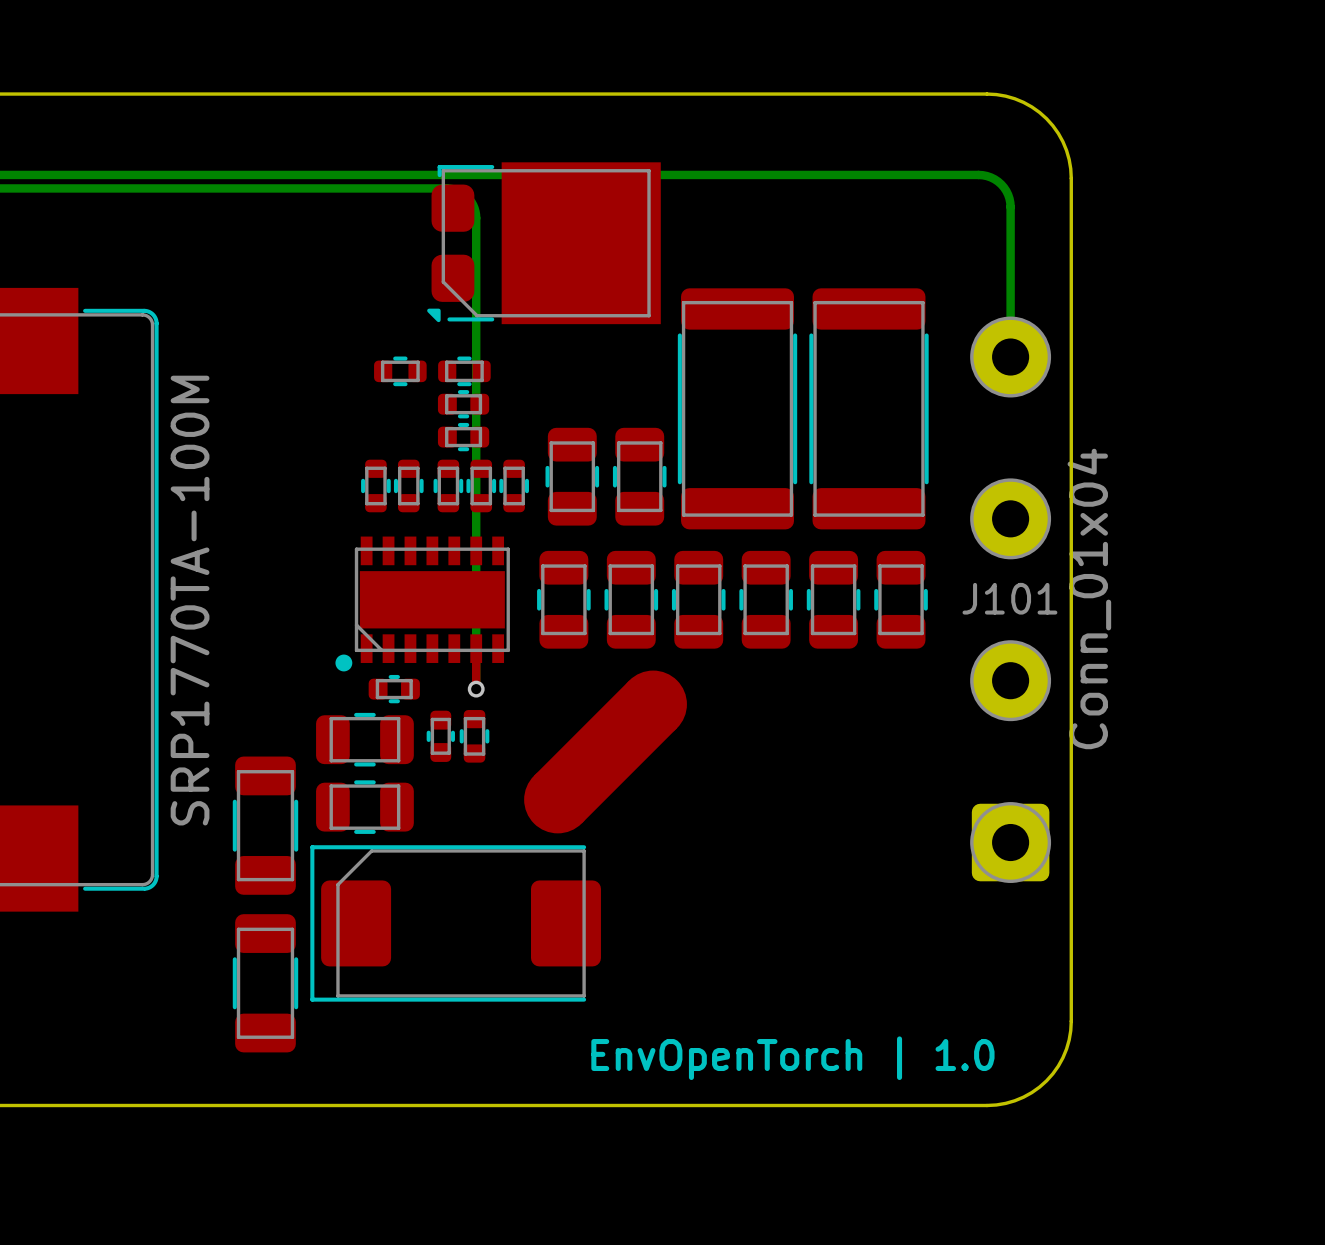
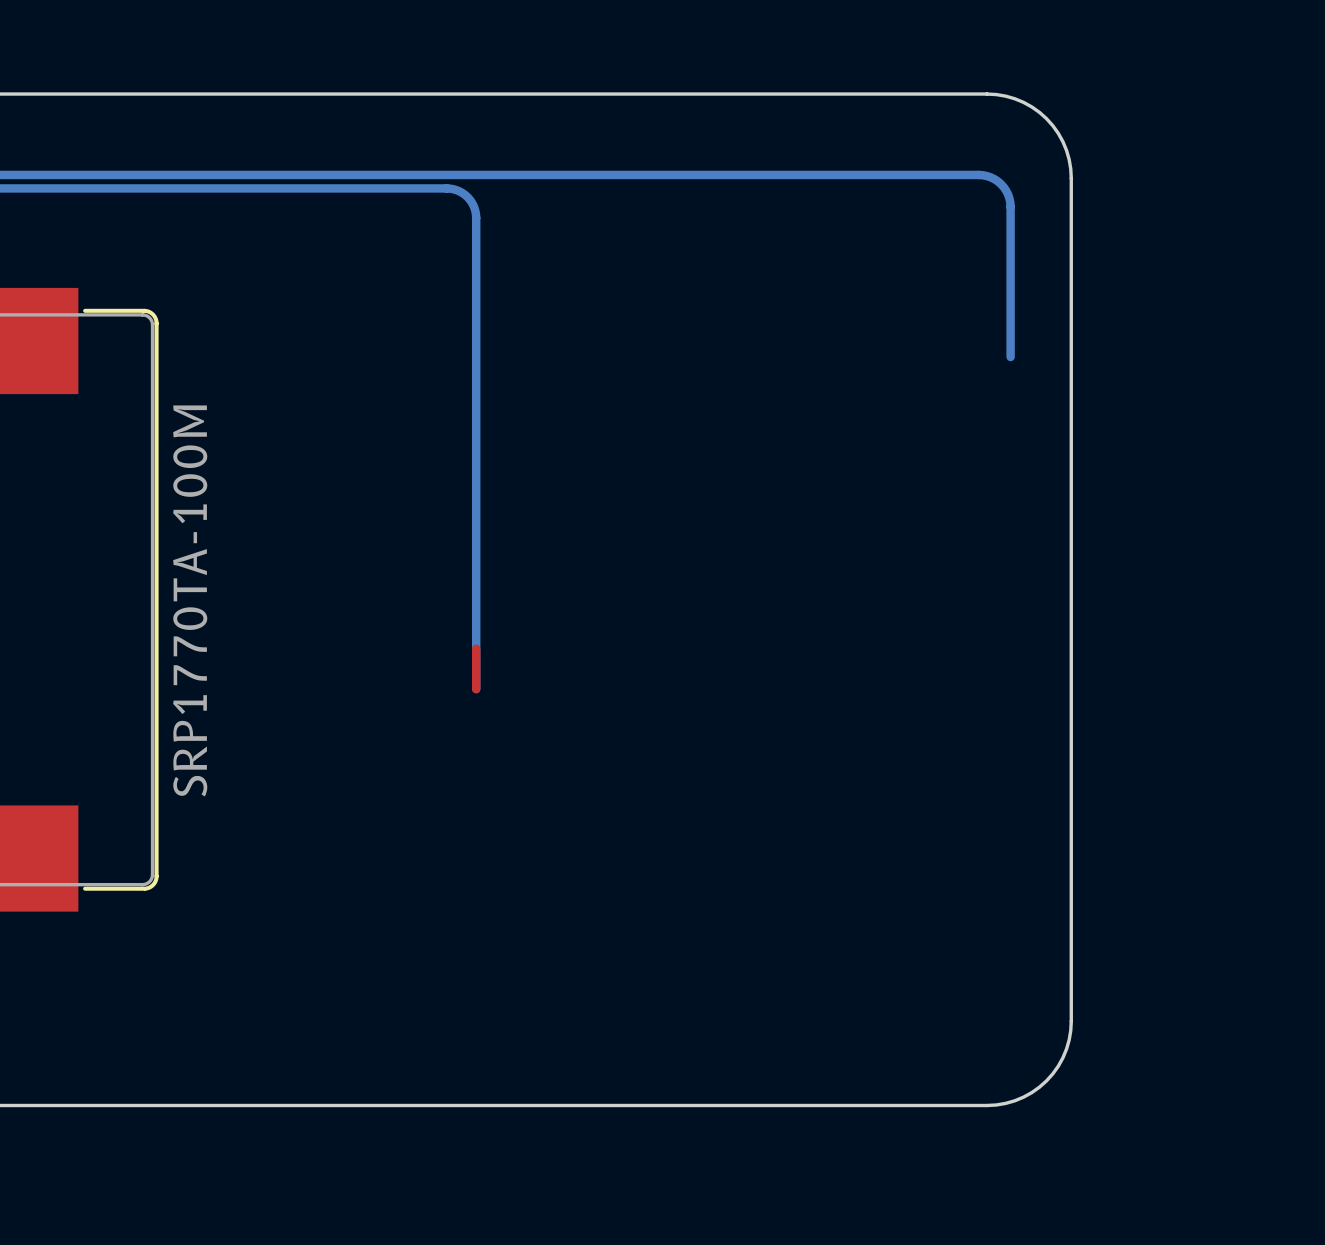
part: (543, 243) -> none
part: (400, 371) -> none
part: (464, 371) -> none
part: (463, 404) -> none
part: (737, 408) -> none
part: (868, 408) -> none
part: (463, 437) -> none
part: (572, 476) -> none
part: (639, 476) -> none
part: (375, 485) -> none
part: (408, 485) -> none
part: (448, 485) -> none
part: (481, 485) -> none
part: (514, 485) -> none
part: (563, 599) -> none
part: (631, 599) -> none
part: (698, 599) -> none
part: (766, 599) -> none
part: (833, 599) -> none
part: (901, 599) -> none
J101: Conn_01x04 (1010, 599) -> none
part: (422, 603) -> none
part: (394, 689) -> none
via: (476, 689) -> none
part: (440, 736) -> none
part: (474, 736) -> none
part: (364, 739) -> none
part: (605, 751) -> none
part: (364, 807) -> none
part: (265, 825) -> none
part: (455, 923) -> none
part: (265, 983) -> none
text: EnvOpenTorch | 1.0 (792, 1058) -> none

